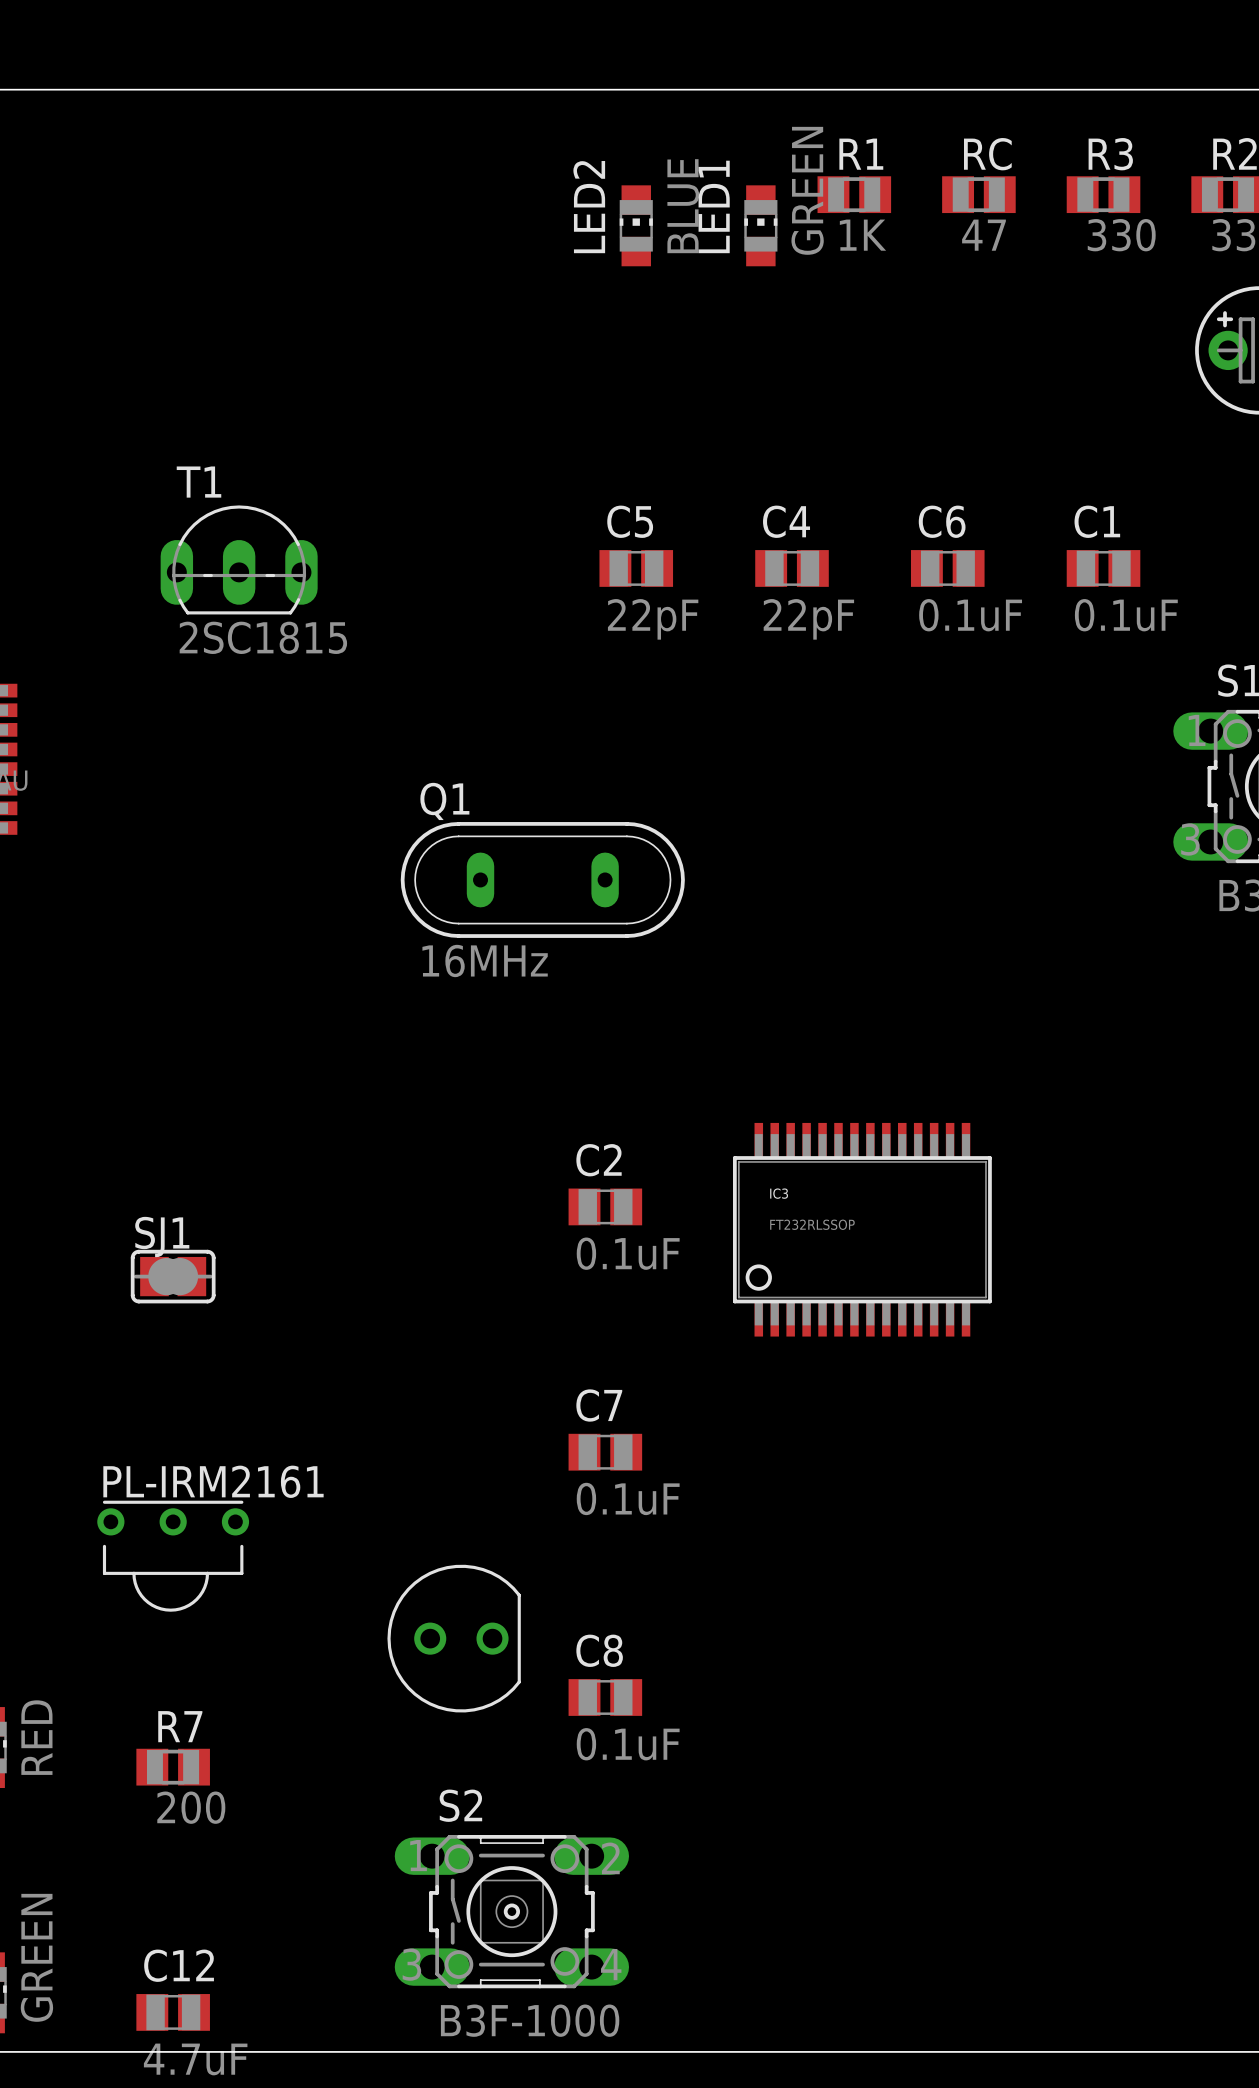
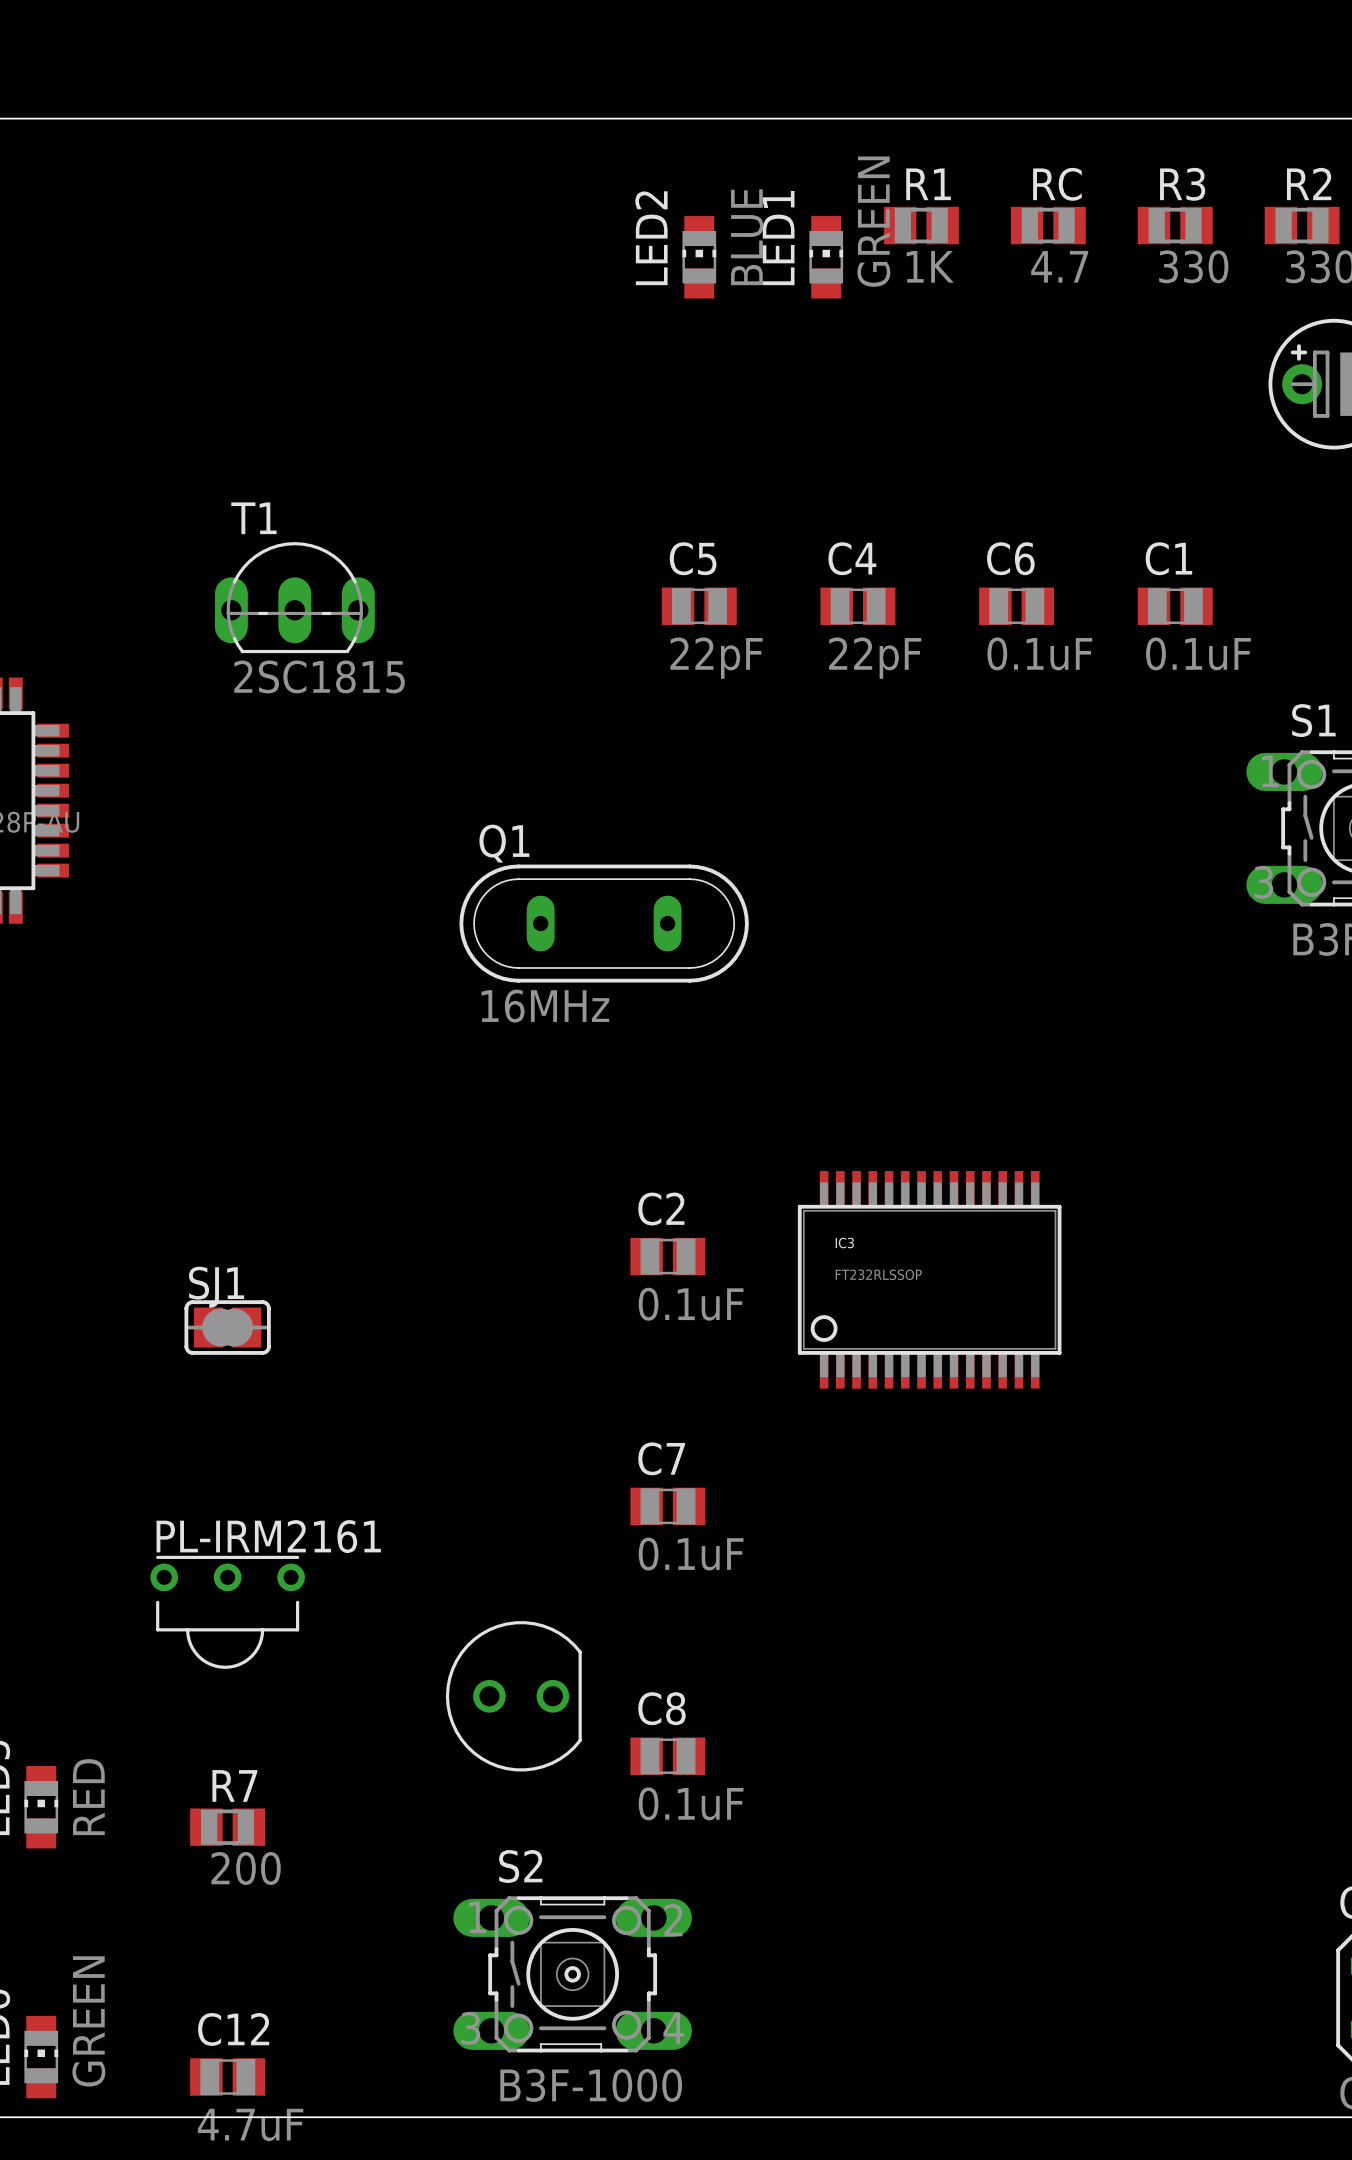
RC value: 47 (983, 235) -> 4.7 (1059, 266)

